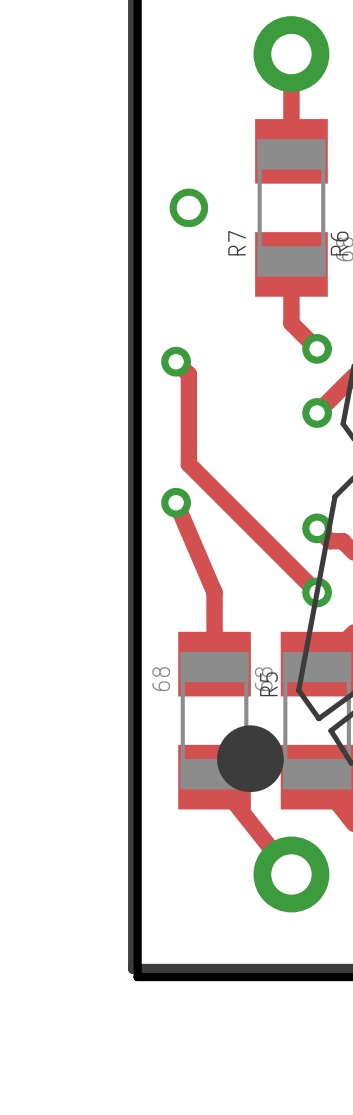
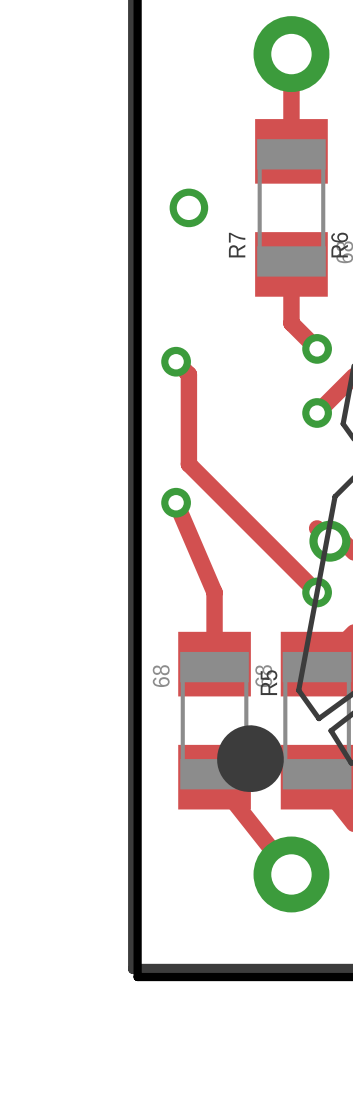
via size: [302, 513, 332, 544] -> [309, 520, 351, 562]

